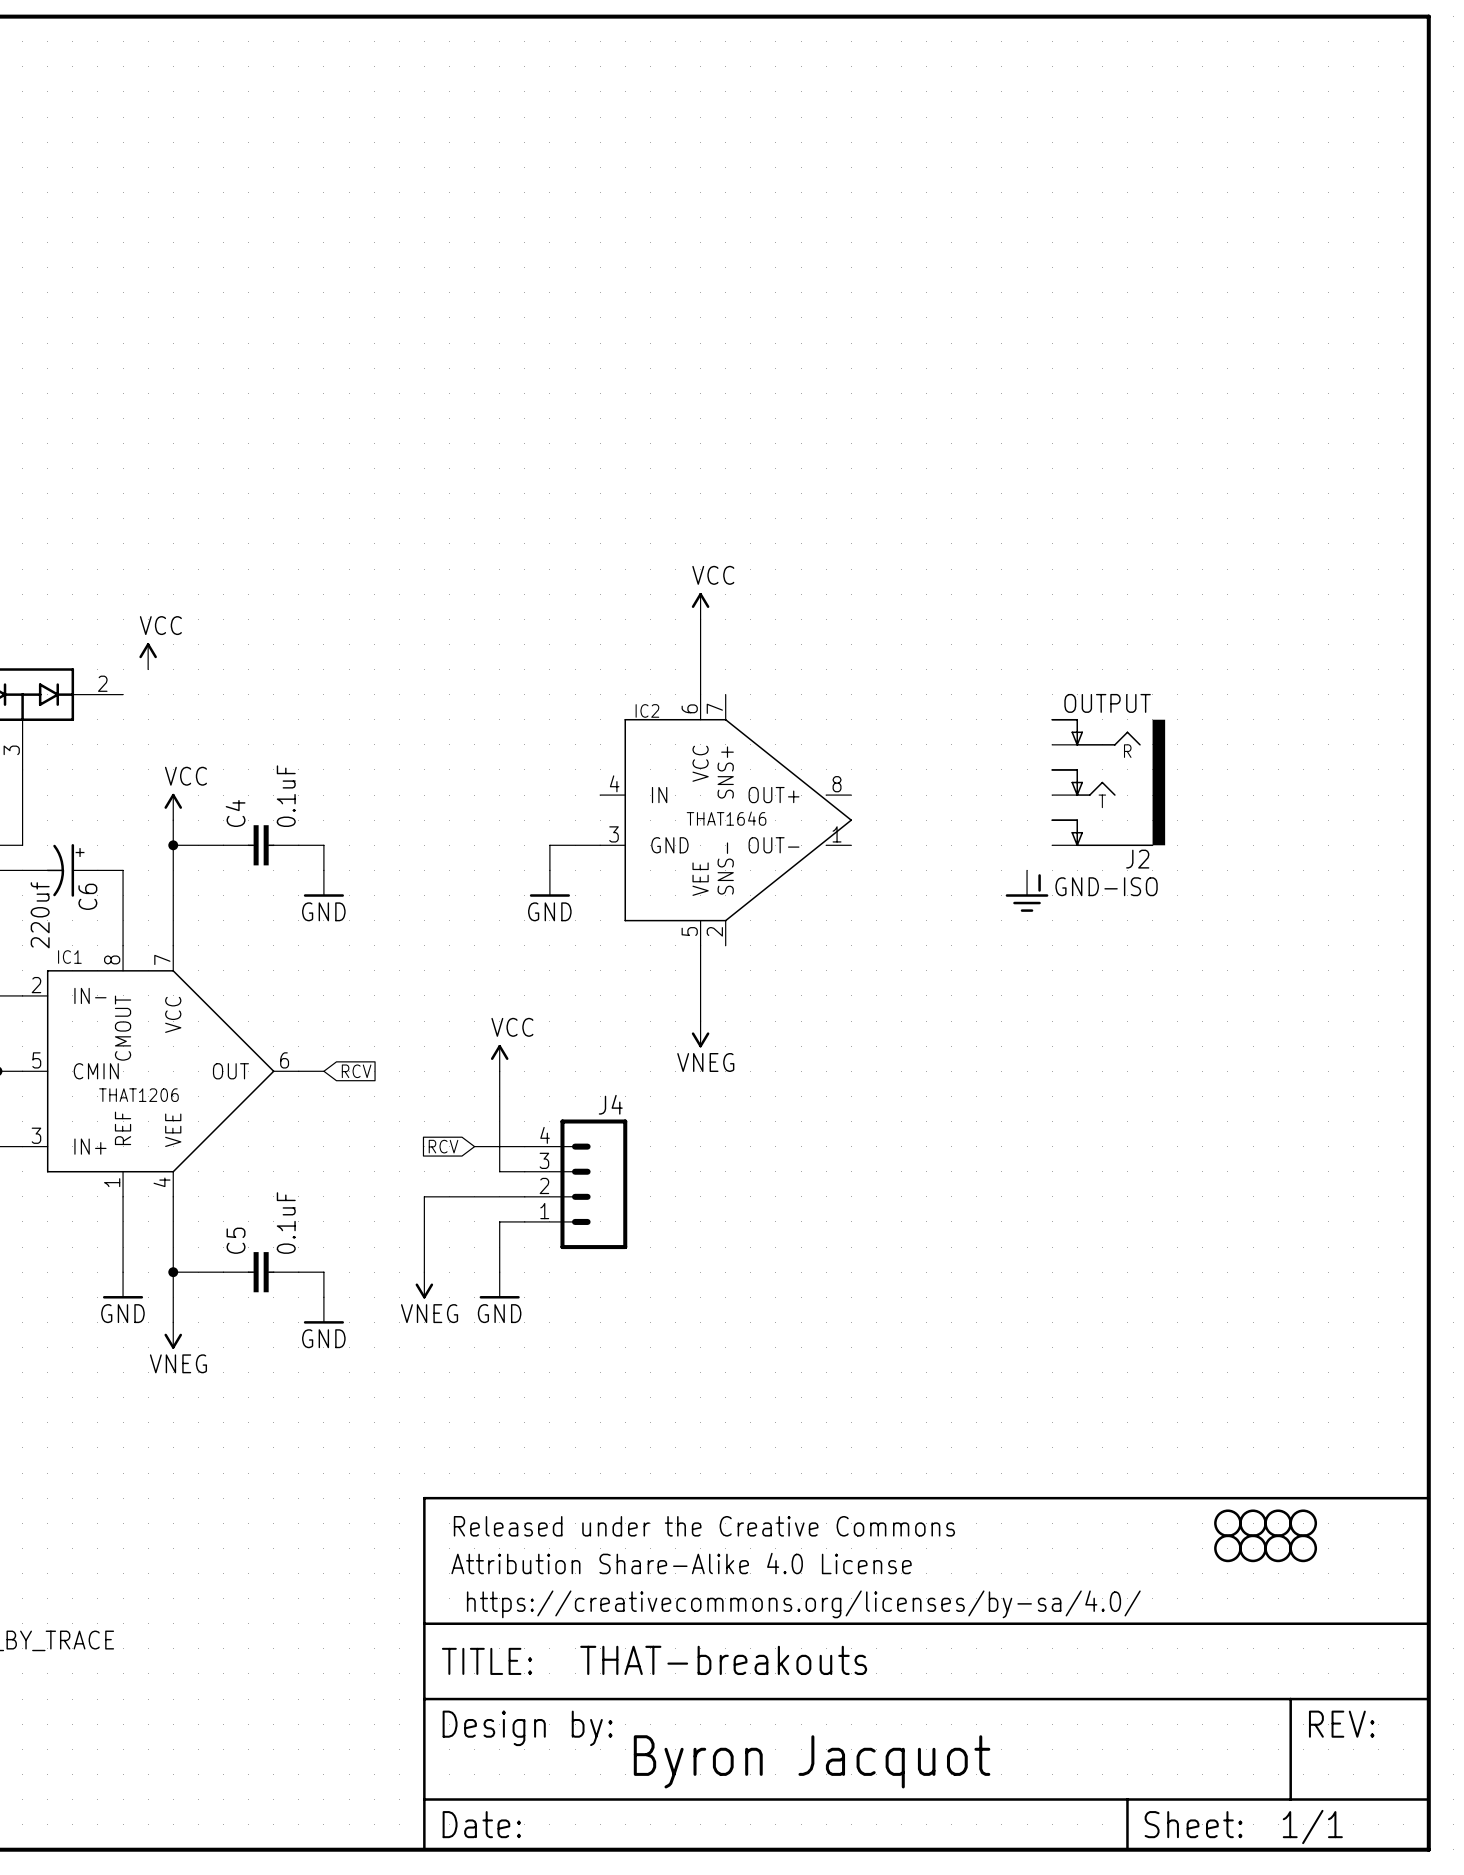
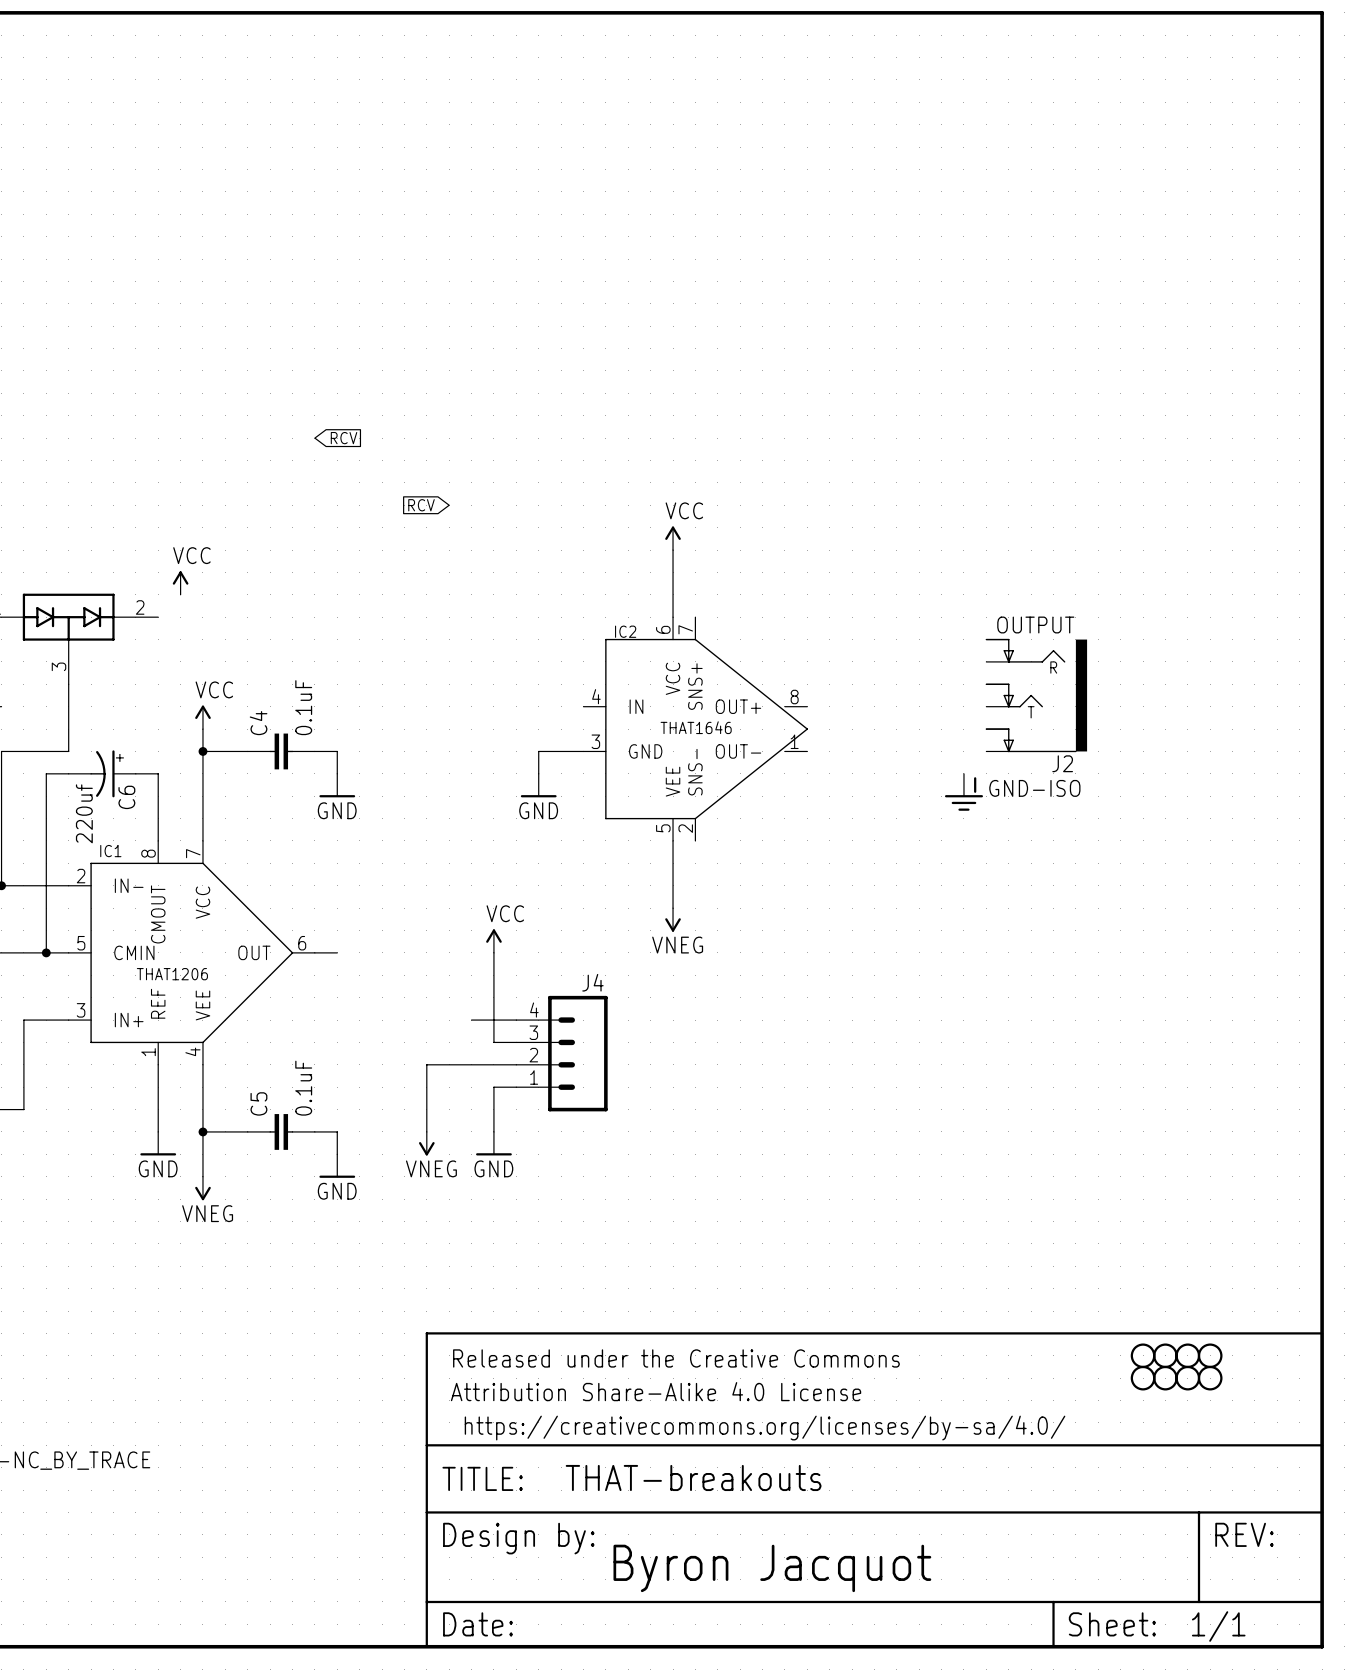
global label: none -> RCV (344, 438)
global label: none -> RCV (421, 505)
global label: RCV (356, 1071) -> none
global label: RCV (443, 1146) -> none

